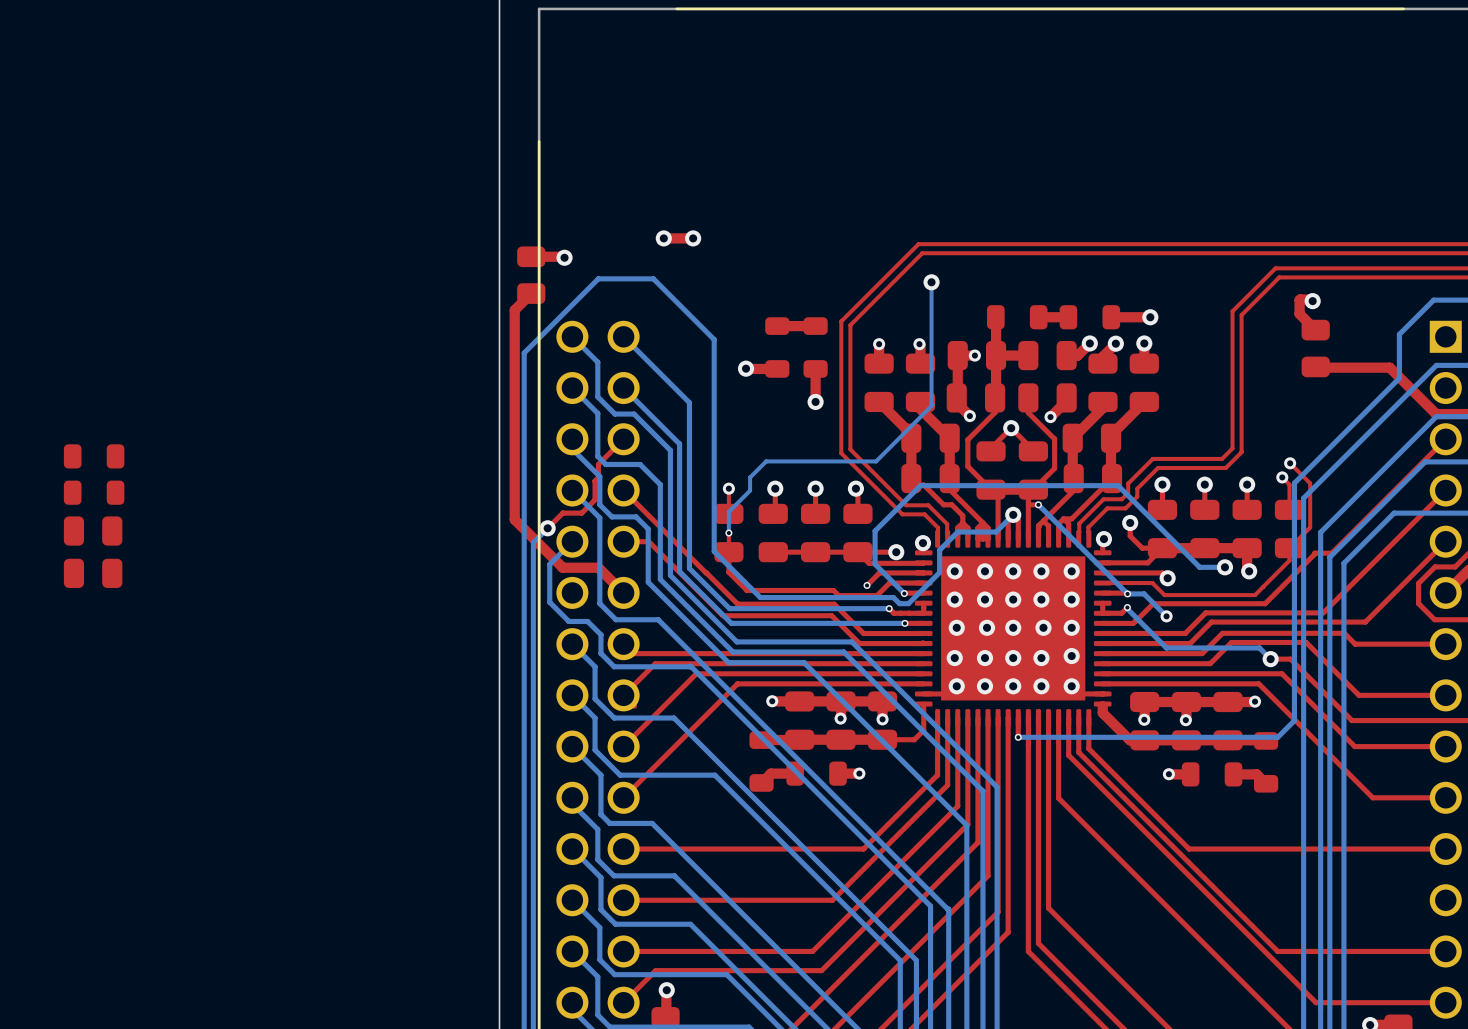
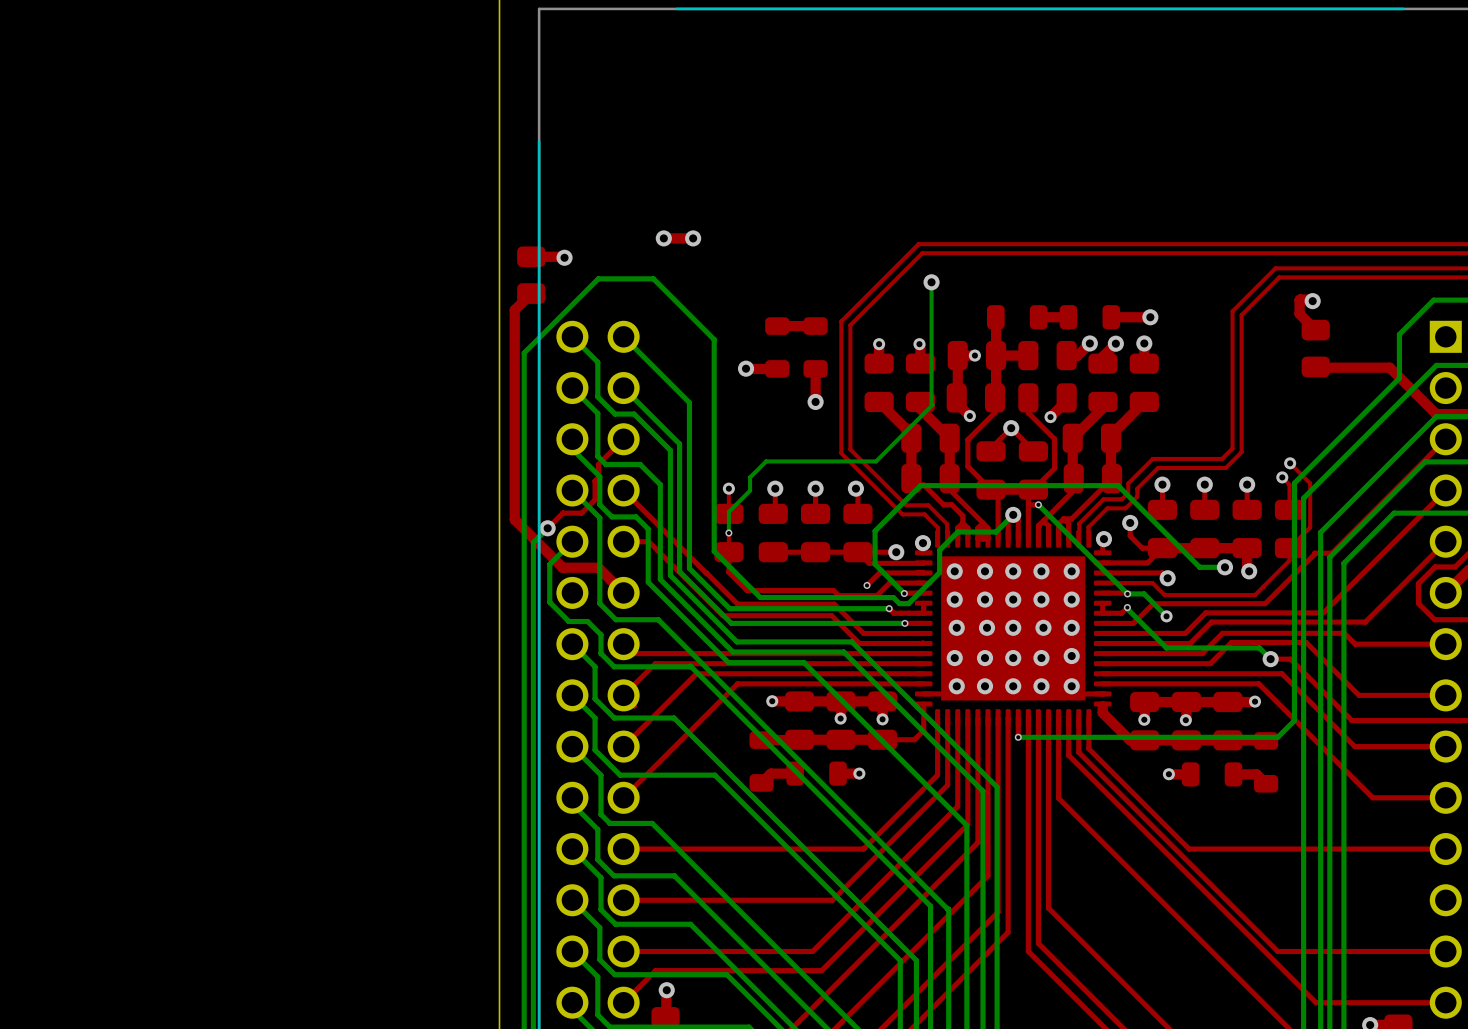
part: (94, 456) -> none
part: (94, 492) -> none
part: (93, 531) -> none
part: (93, 573) -> none

